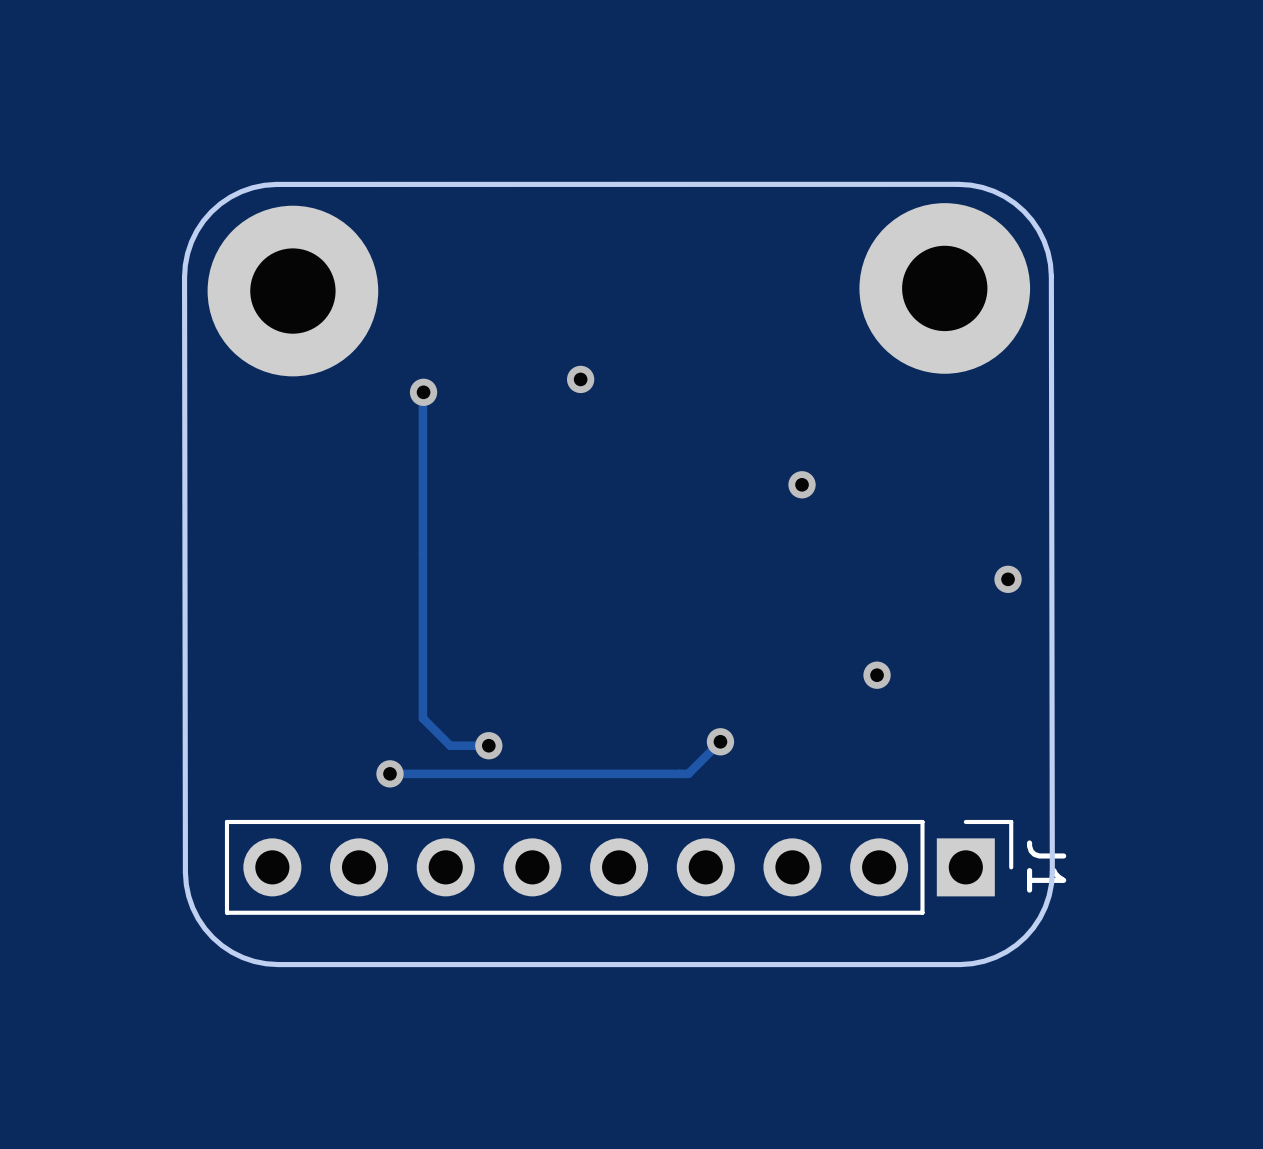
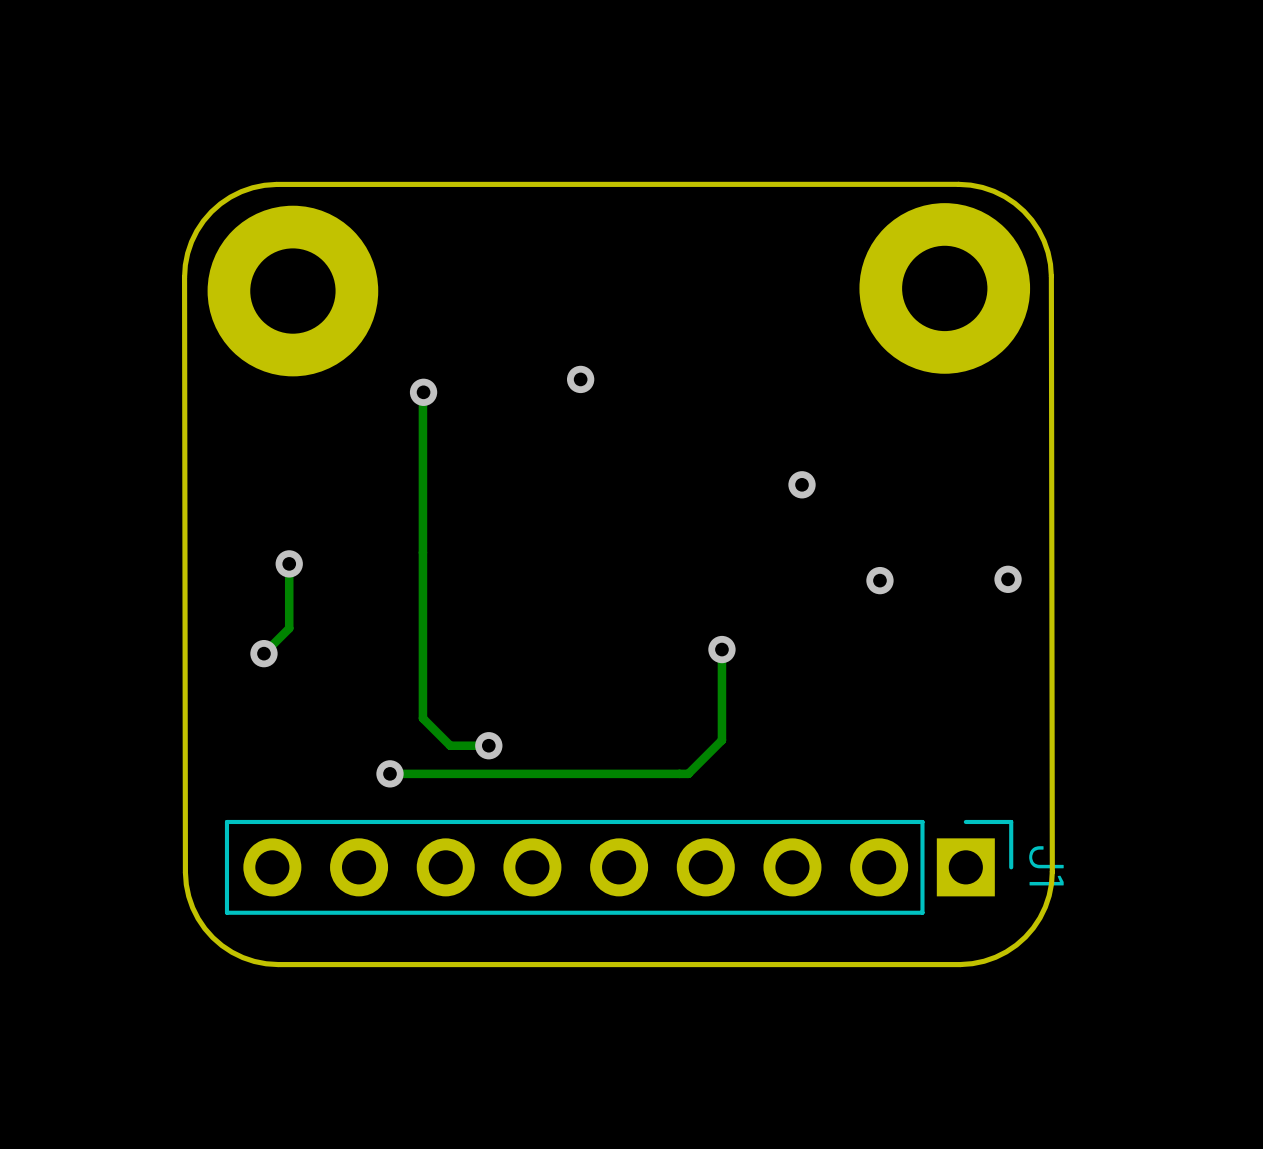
track: none -> (289, 563) (289, 628) (263, 653)
via: none -> (289, 563)
via: none -> (879, 580)
track: none -> (721, 649) (720, 741)
via: none -> (721, 649)
via: none -> (263, 653)
via: (877, 675) -> none
via: (720, 741) -> none

